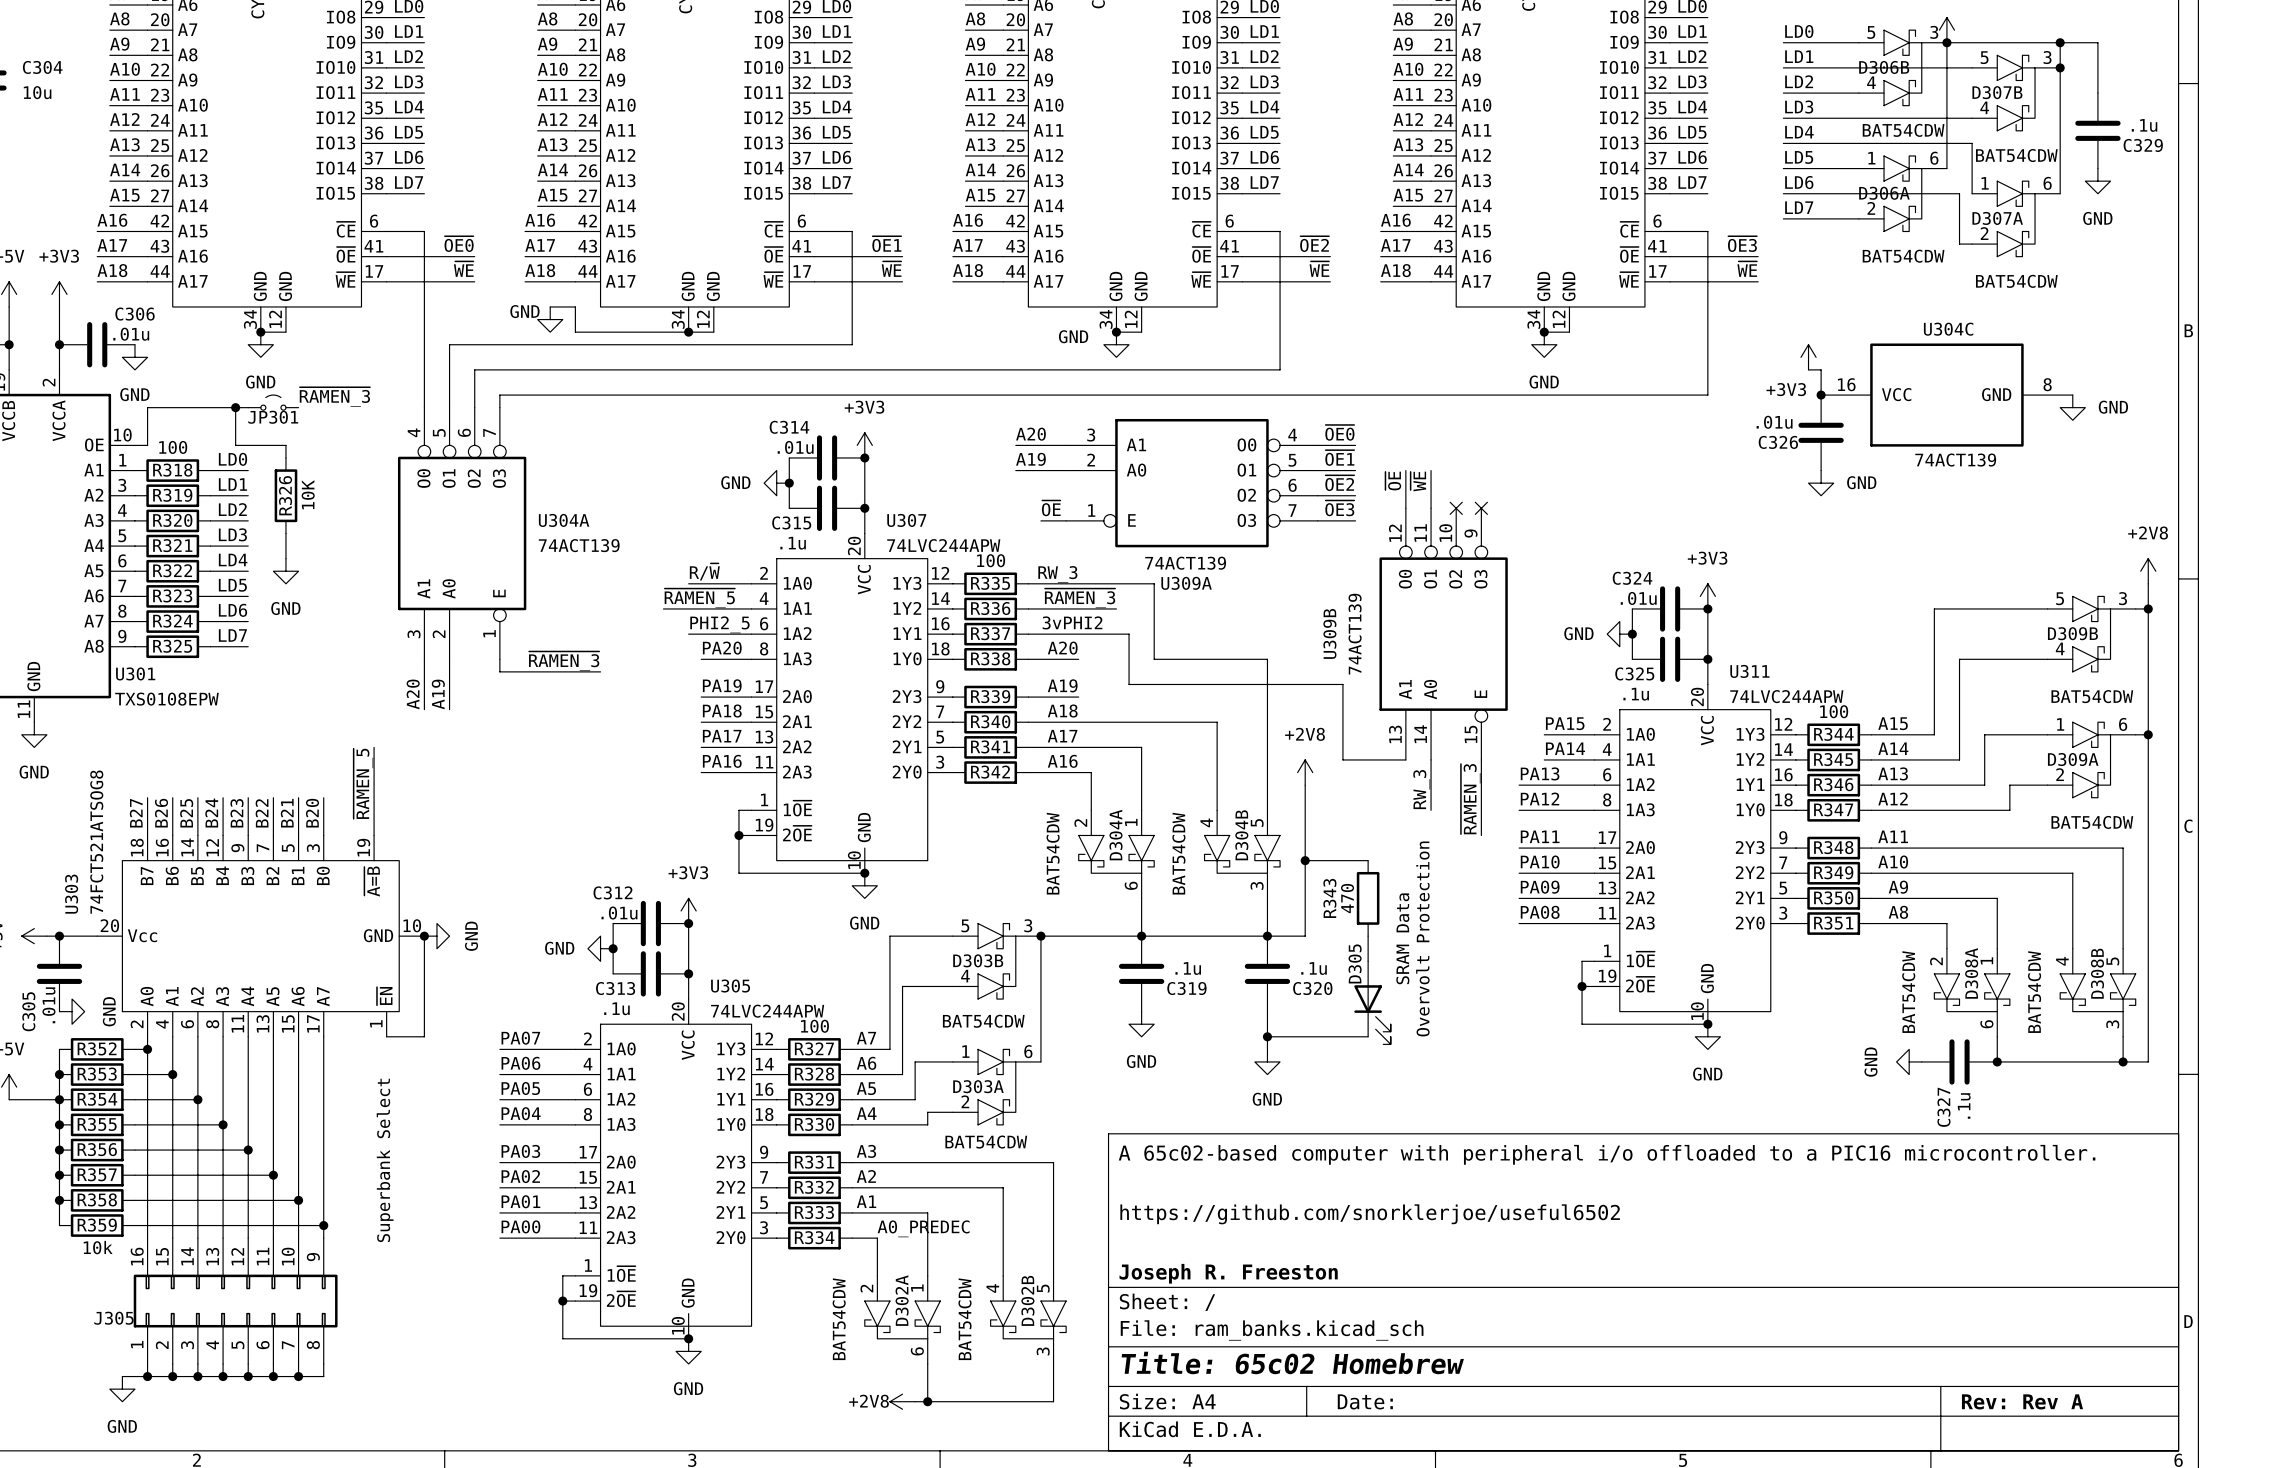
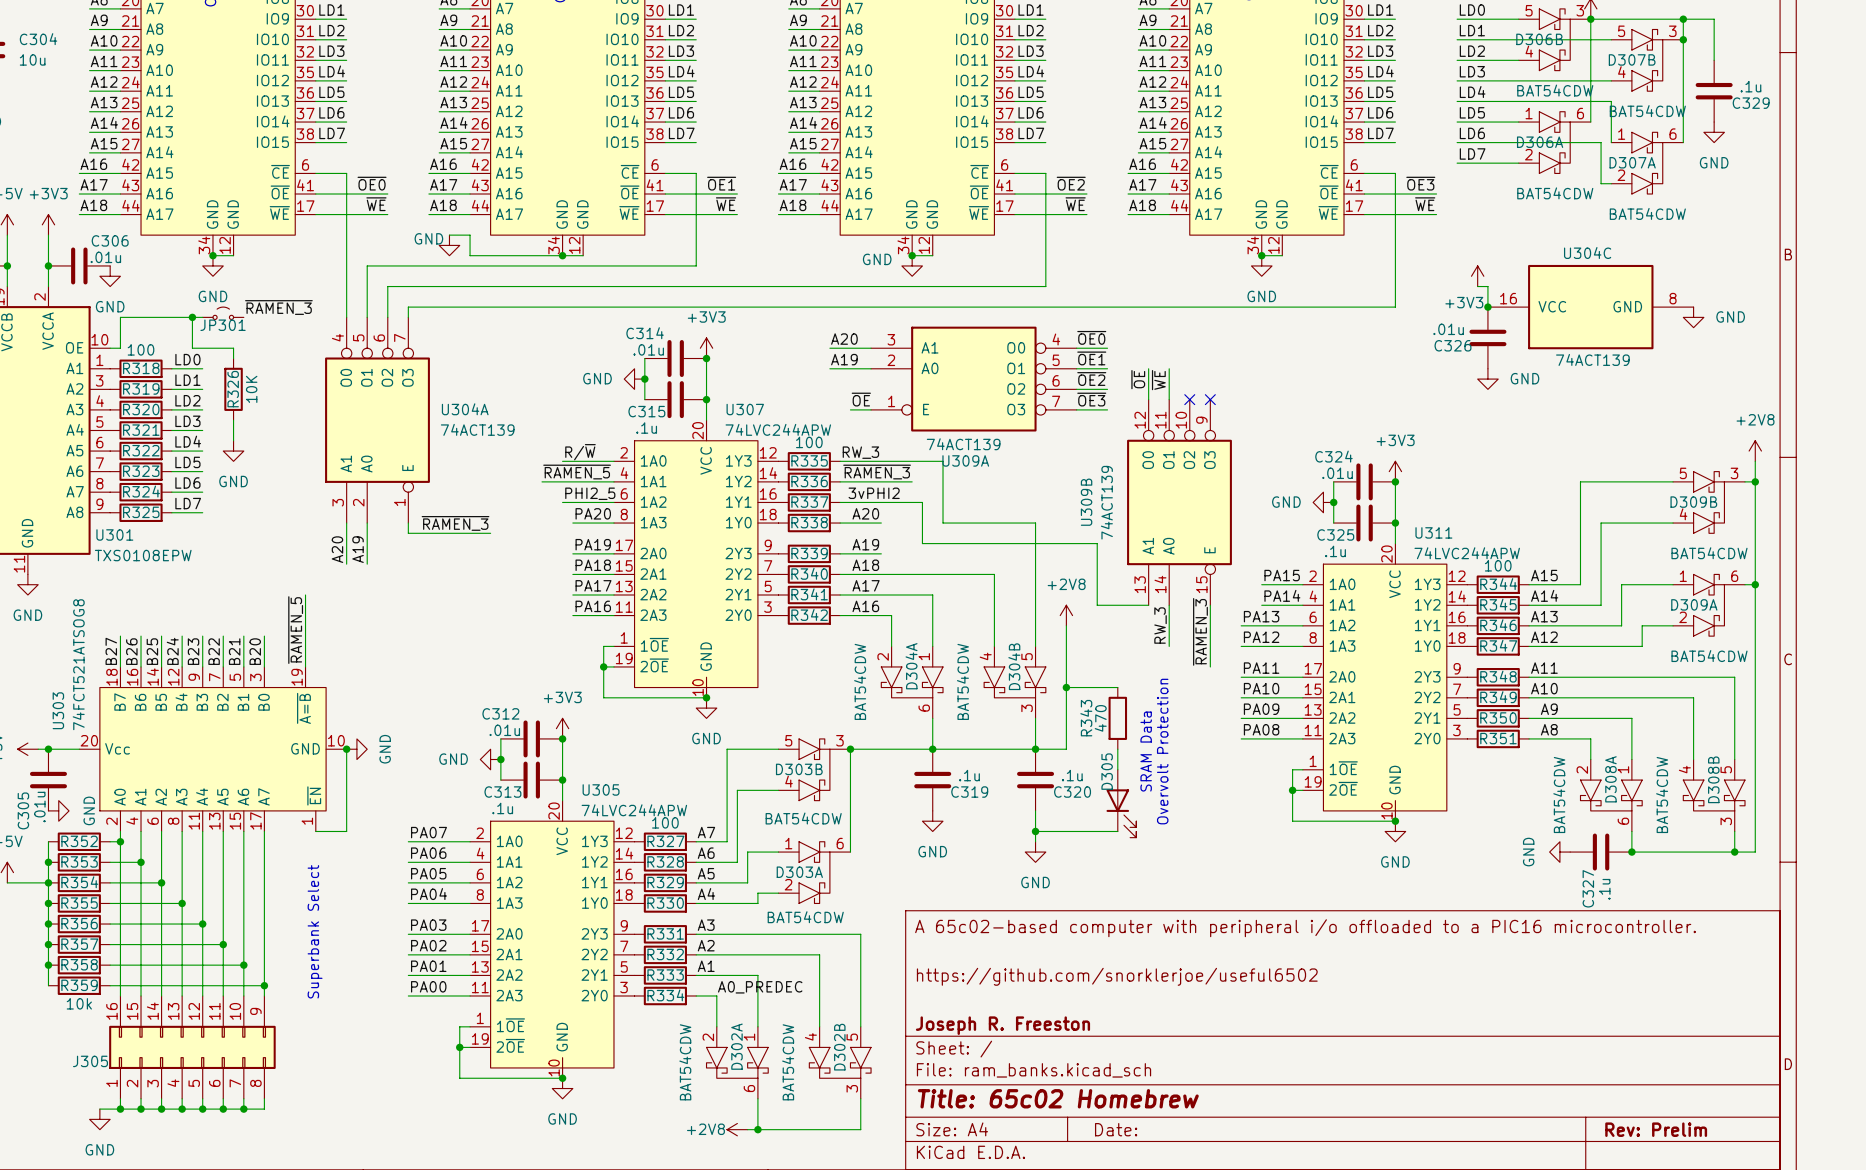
title block: Rev: Rev A (2022, 1401) -> Rev: Prelim (1656, 1129)

